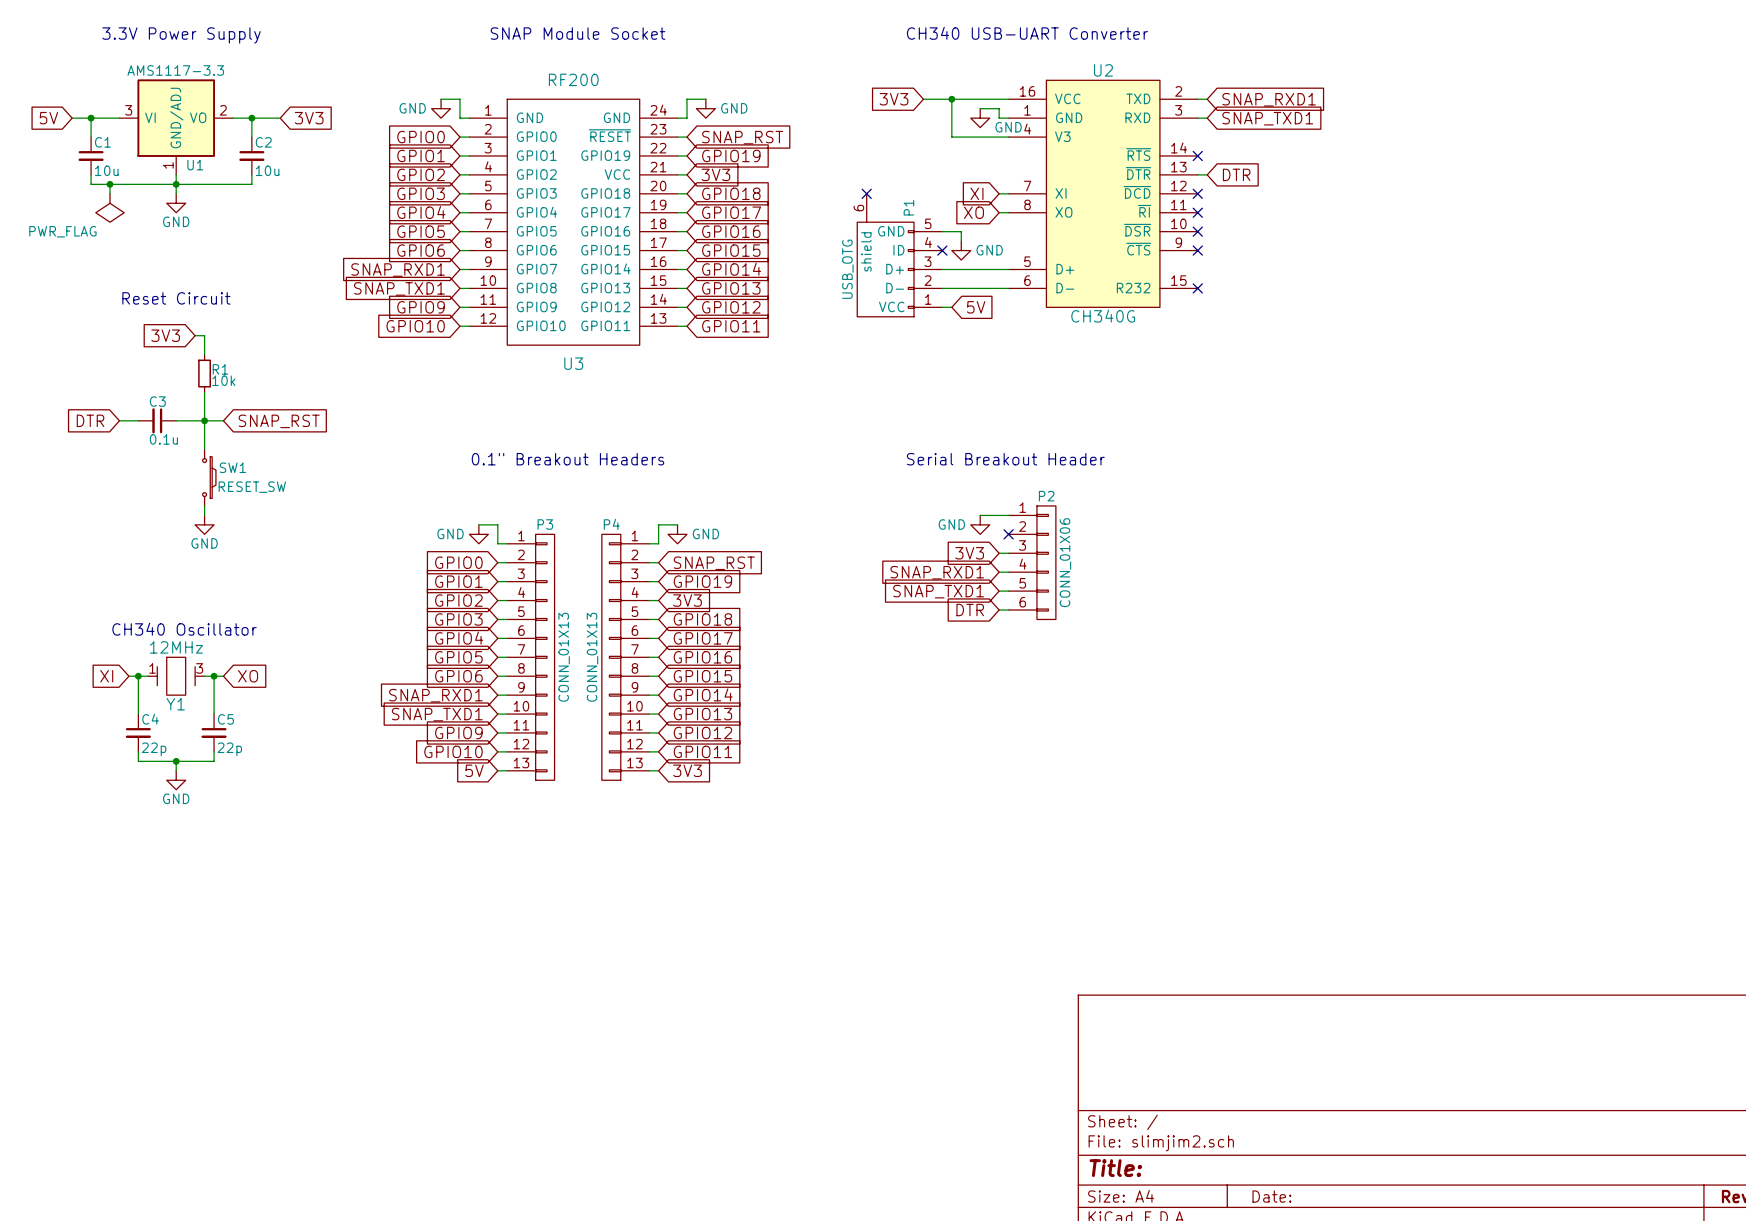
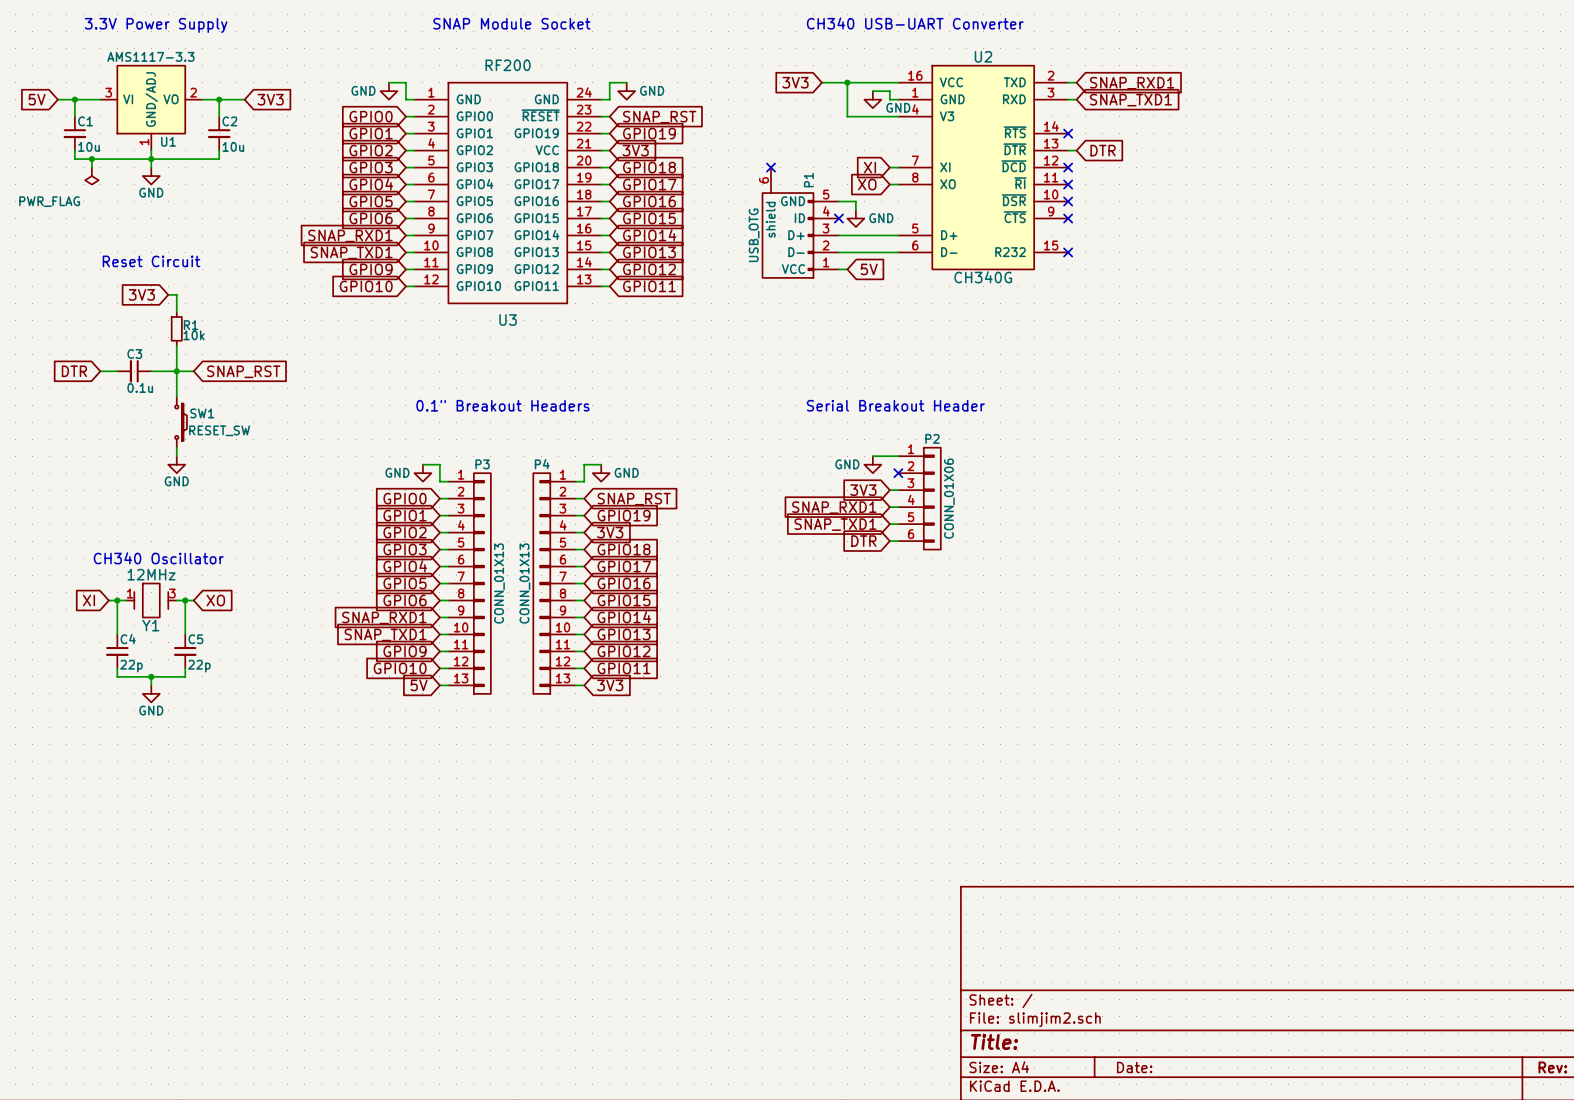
power symbol shape: [95, 193, 125, 223] -> [85, 167, 99, 185]

